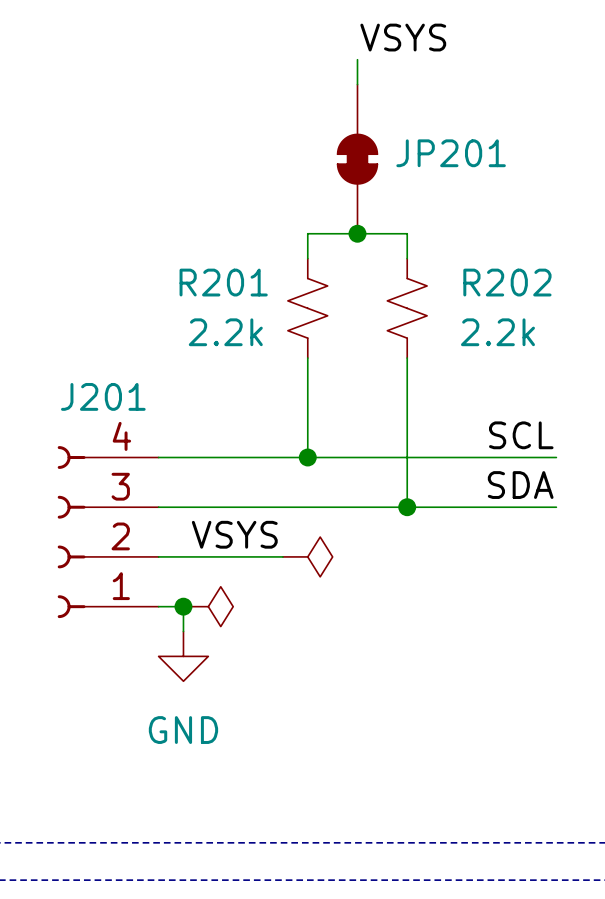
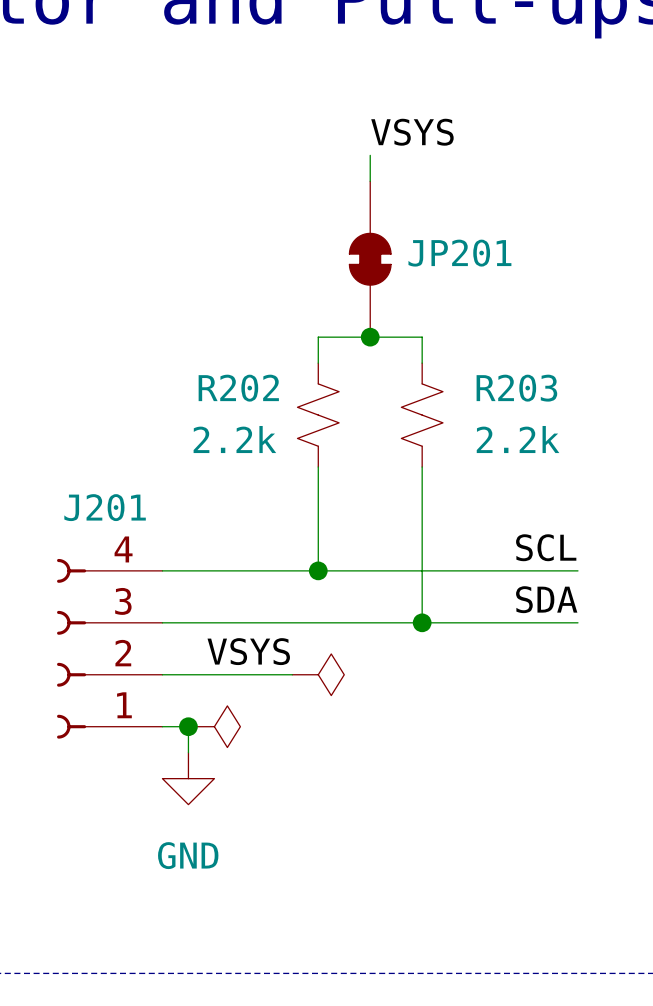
R201 name: R201 (223, 282) -> R202 (238, 388)
R202 name: R202 (507, 282) -> R203 (516, 388)

